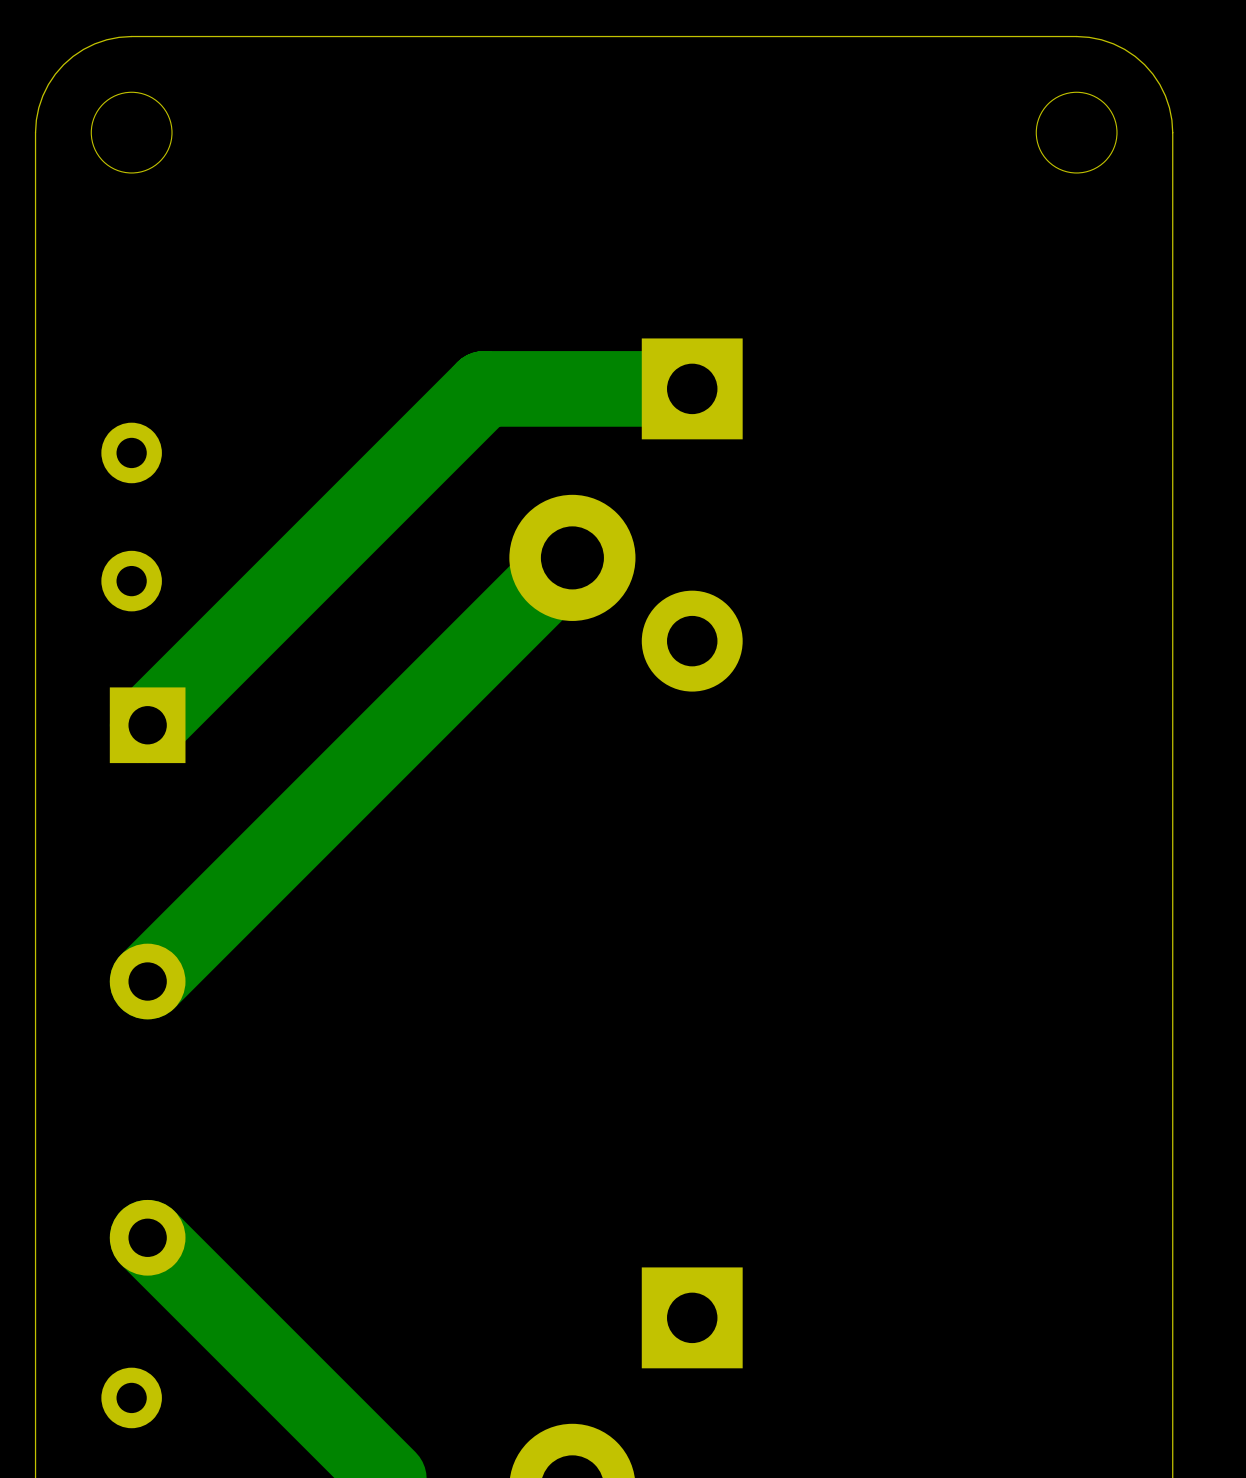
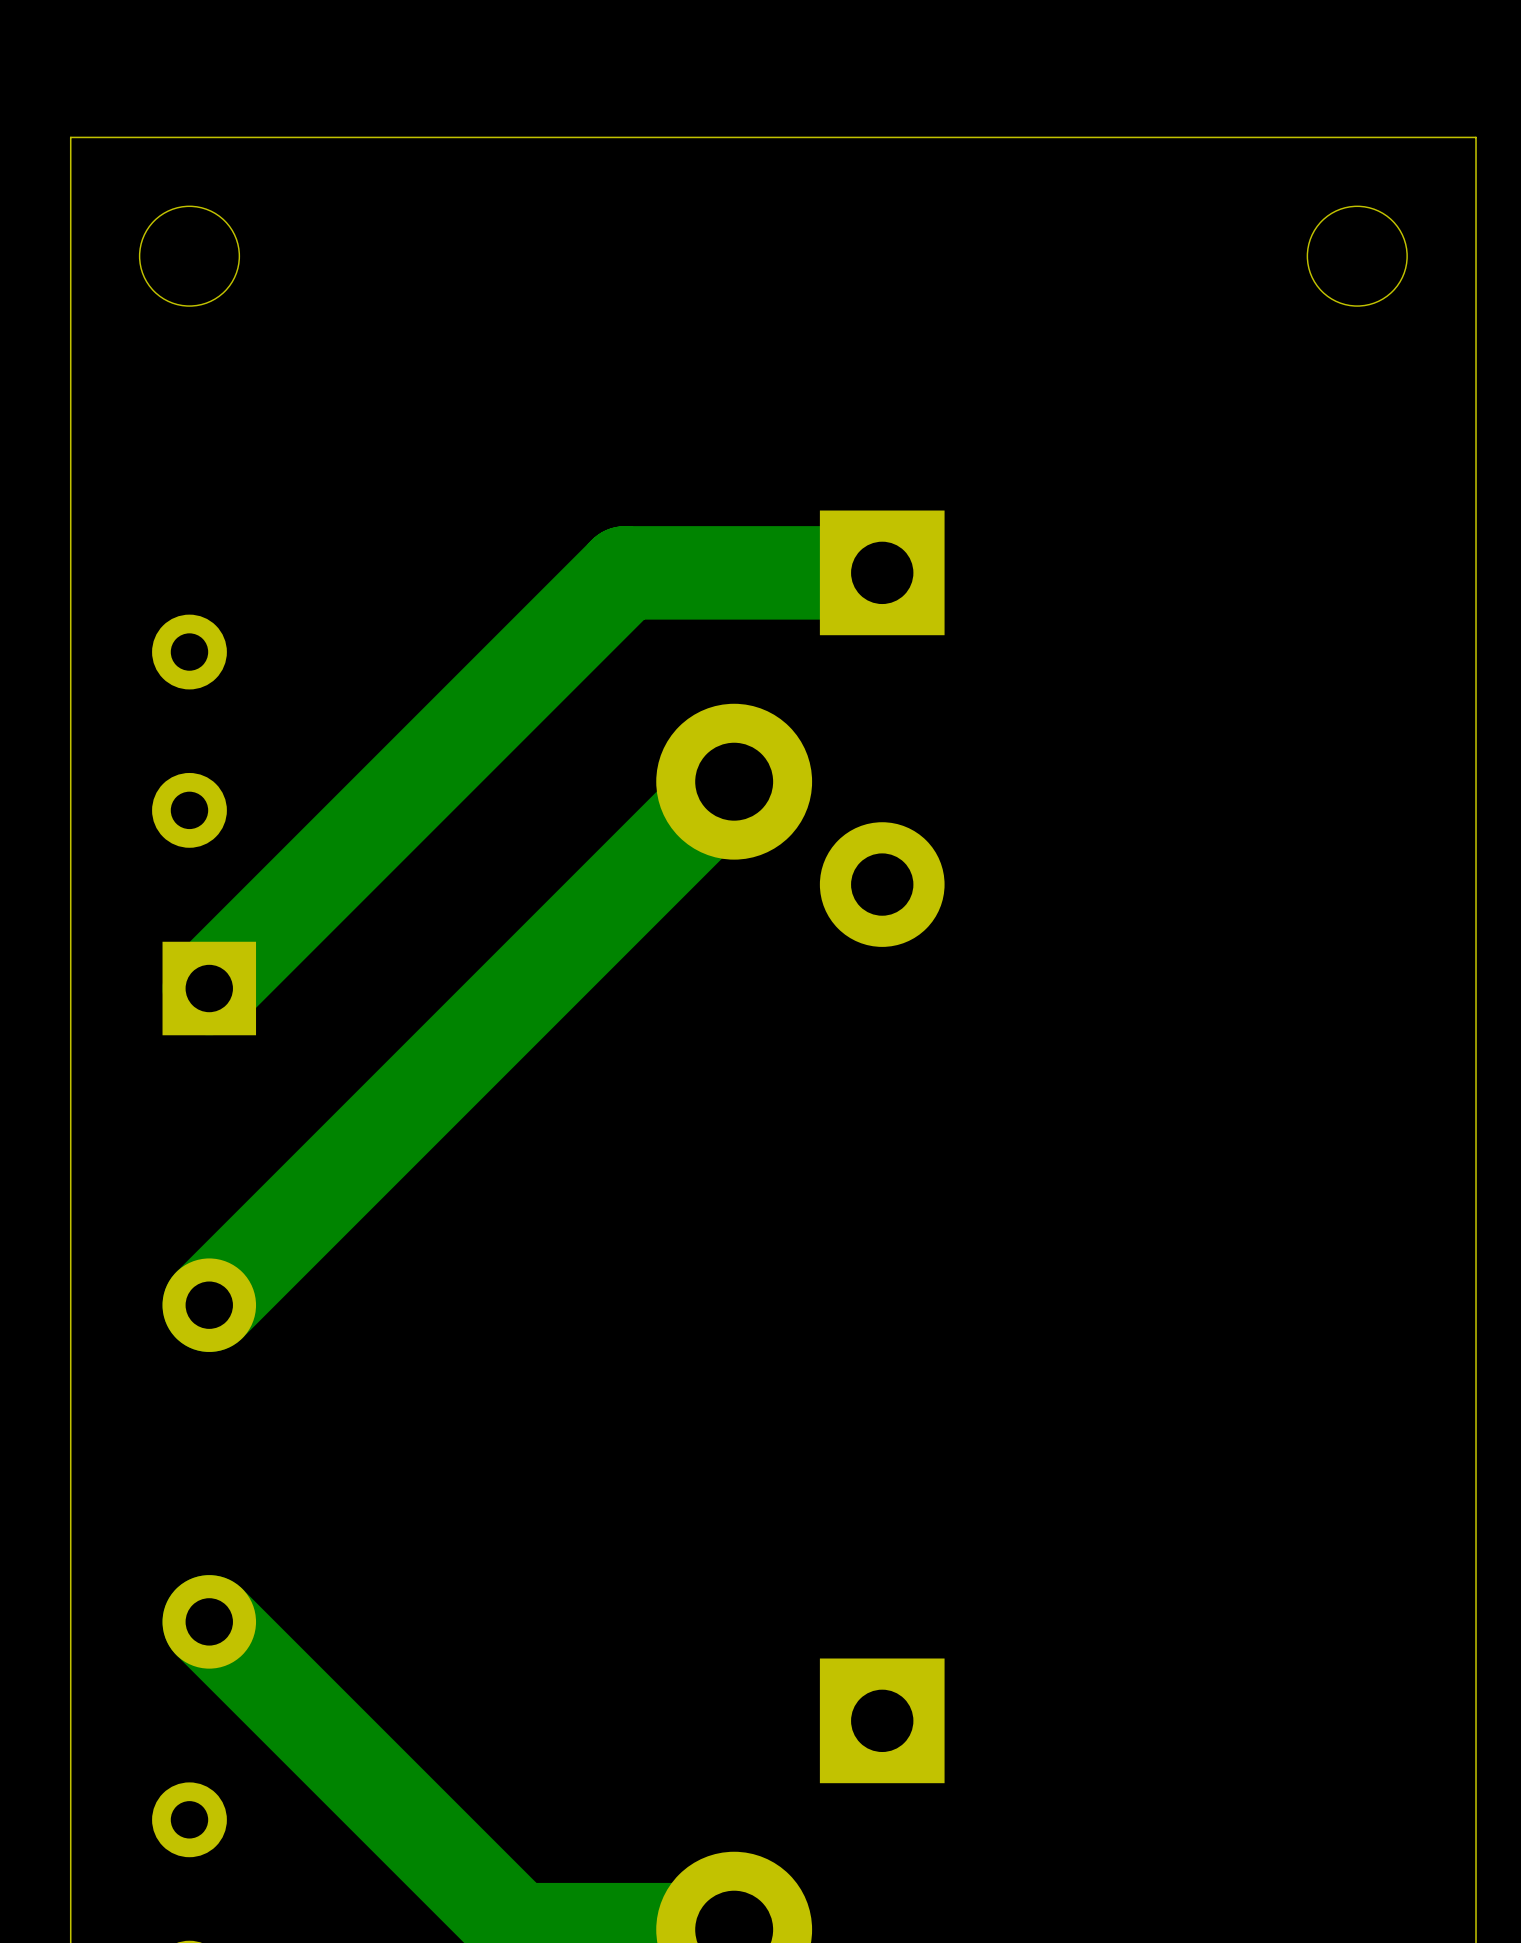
board edge: (131, 36) (106, 39) (94, 43) (73, 56) (63, 64) (48, 84) (42, 95) (36, 120) (35, 132) -> (189, 137) (70, 137) (70, 256)
board edge: (1076, 36) (1101, 39) (1113, 43) (1135, 56) (1144, 64) (1159, 84) (1165, 95) (1171, 120) (1172, 132) -> (1357, 137) (1476, 137) (1476, 256)

